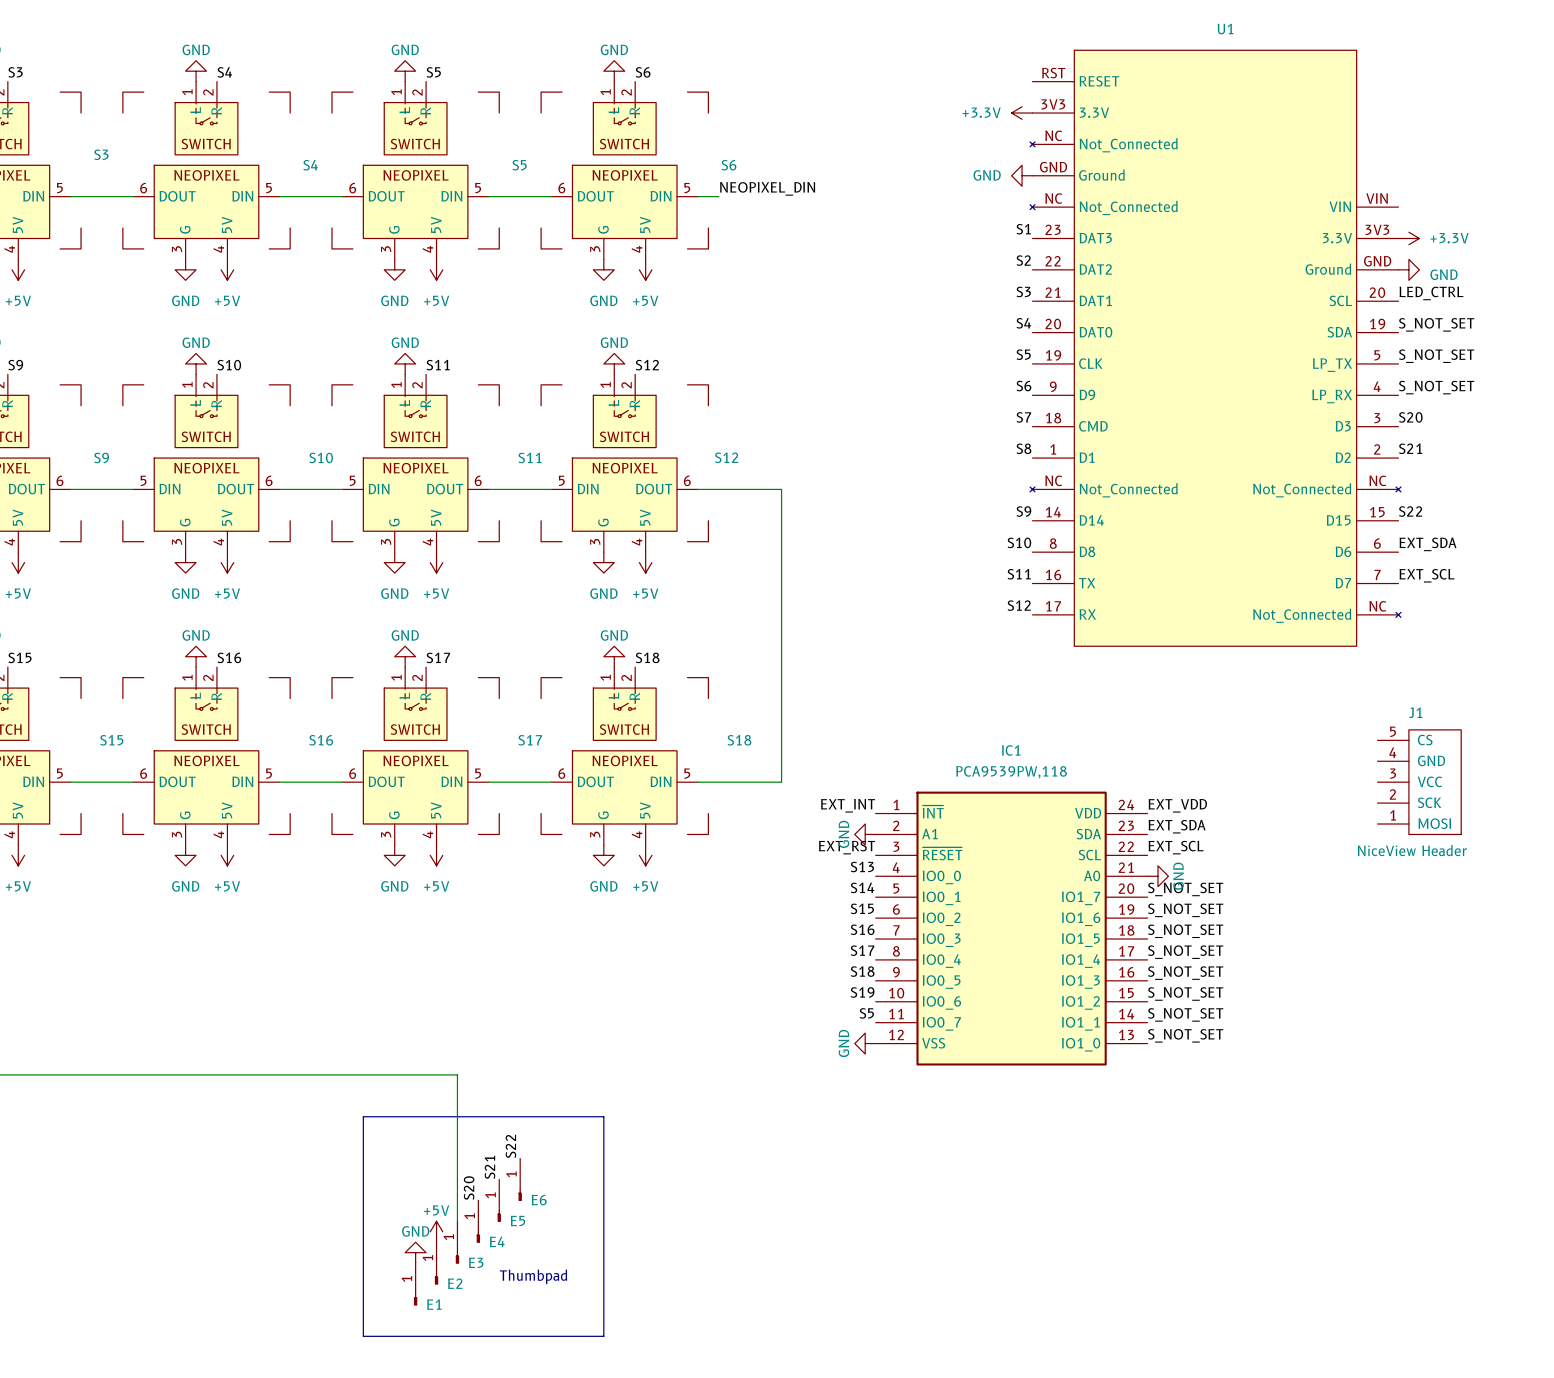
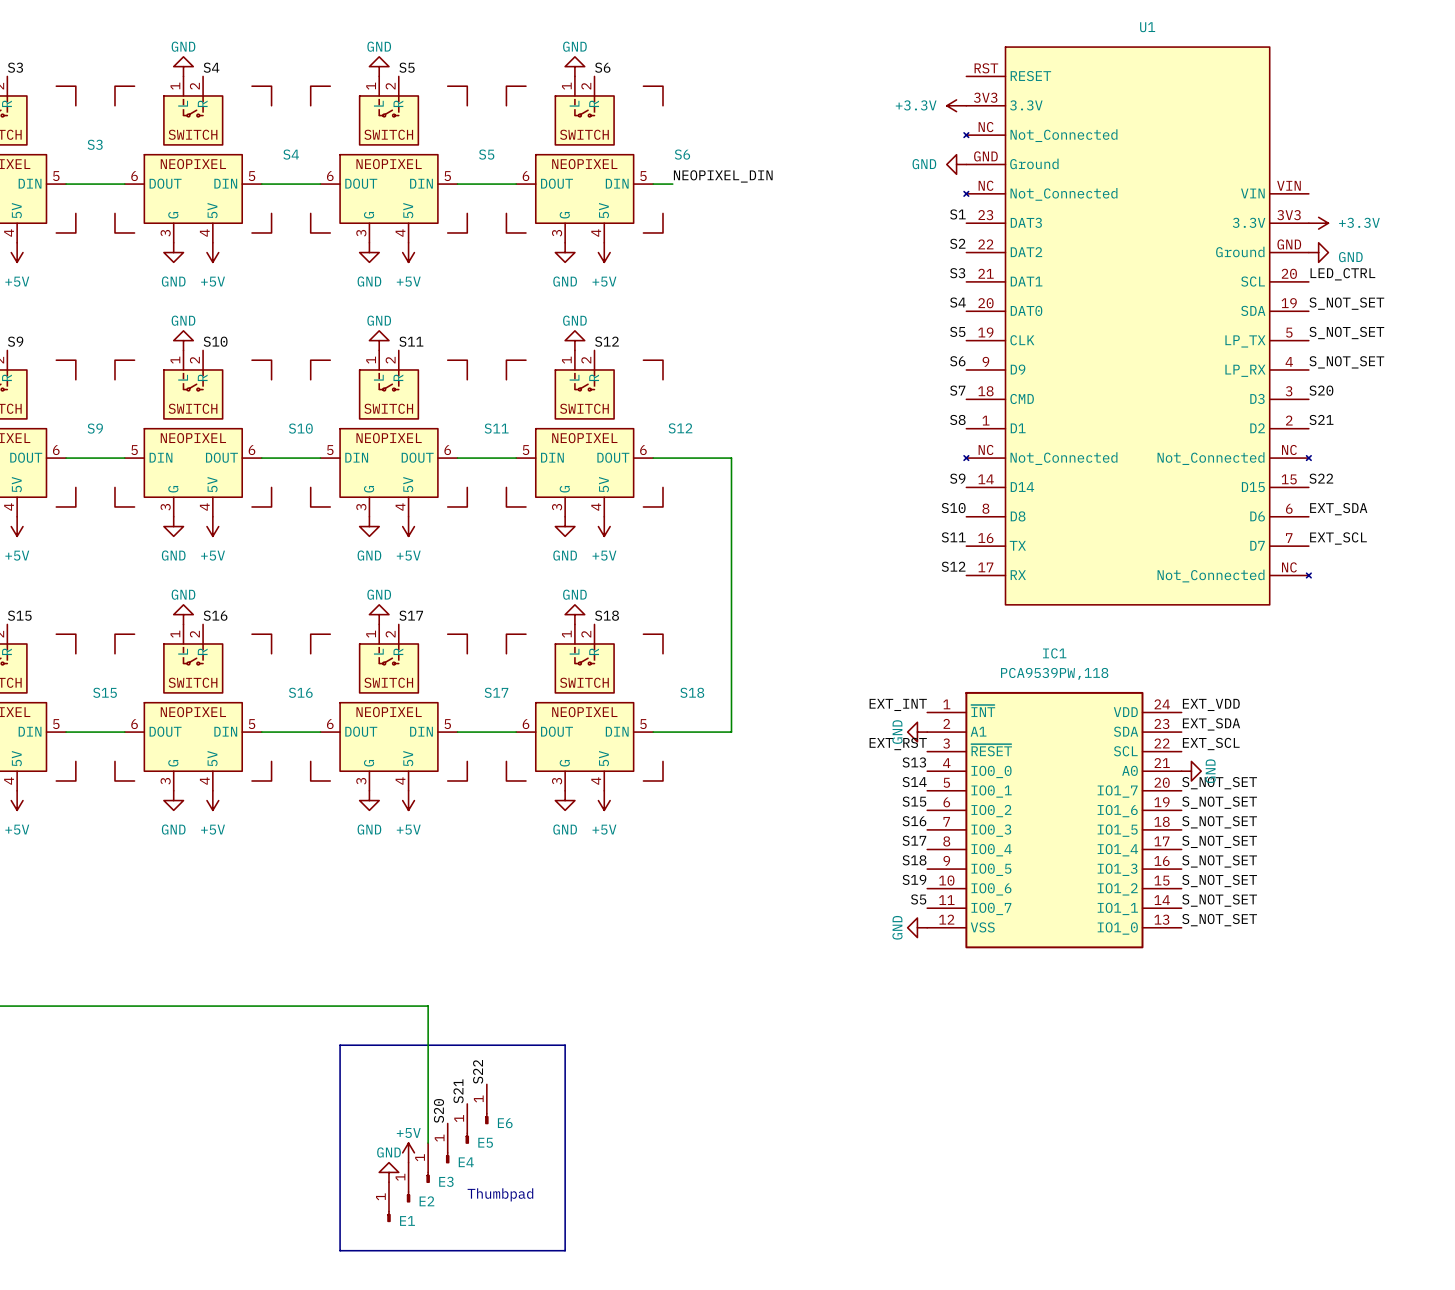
power symbol: none -> GND (917, 732)
J1: NiceView Header (1419, 782) -> none
label position: EXT_INT (848, 805) -> EXT_INT (898, 704)
label position: EXT_VDD (1177, 805) -> EXT_VDD (1211, 704)
power symbol: none -> GND (1191, 771)
label position: EXT_SDA (1177, 826) -> EXT_SDA (1211, 724)
power symbol: GND (865, 834) -> none
label: none -> S_NOT_SET (1219, 783)
label position: EXT_RST (847, 847) -> EXT_RST (898, 744)
label position: EXT_SCL (1176, 847) -> EXT_SCL (1211, 744)
label: none -> S_NOT_SET (1219, 802)
label position: S13 (862, 867) -> S13 (914, 762)
power symbol: GND (1157, 876) -> none
label: none -> S_NOT_SET (1219, 822)
label position: S14 (862, 887) -> S14 (914, 782)
label: S_NOT_SET (1185, 889) -> none
label: none -> S_NOT_SET (1219, 841)
label position: S15 (862, 908) -> S15 (914, 801)
label: S_NOT_SET (1185, 910) -> none
label: none -> S_NOT_SET (1219, 861)
IC1 position: (1011, 928) -> (1054, 820)
label position: S16 (862, 929) -> S16 (914, 821)
label: S_NOT_SET (1185, 931) -> none
label: none -> S_NOT_SET (1219, 881)
label position: S17 (862, 950) -> S17 (914, 840)
label: S_NOT_SET (1185, 952) -> none
label: none -> S_NOT_SET (1219, 900)
label position: S18 (862, 971) -> S18 (914, 860)
label: S_NOT_SET (1185, 973) -> none
label: none -> S_NOT_SET (1219, 920)
power symbol: none -> GND (917, 927)
label position: S19 (862, 992) -> S19 (914, 879)
label: S_NOT_SET (1185, 993) -> none
label position: S5 (866, 1013) -> S5 (918, 899)
label: S_NOT_SET (1185, 1014) -> none
label: S_NOT_SET (1185, 1035) -> none
power symbol: GND (865, 1043) -> none

